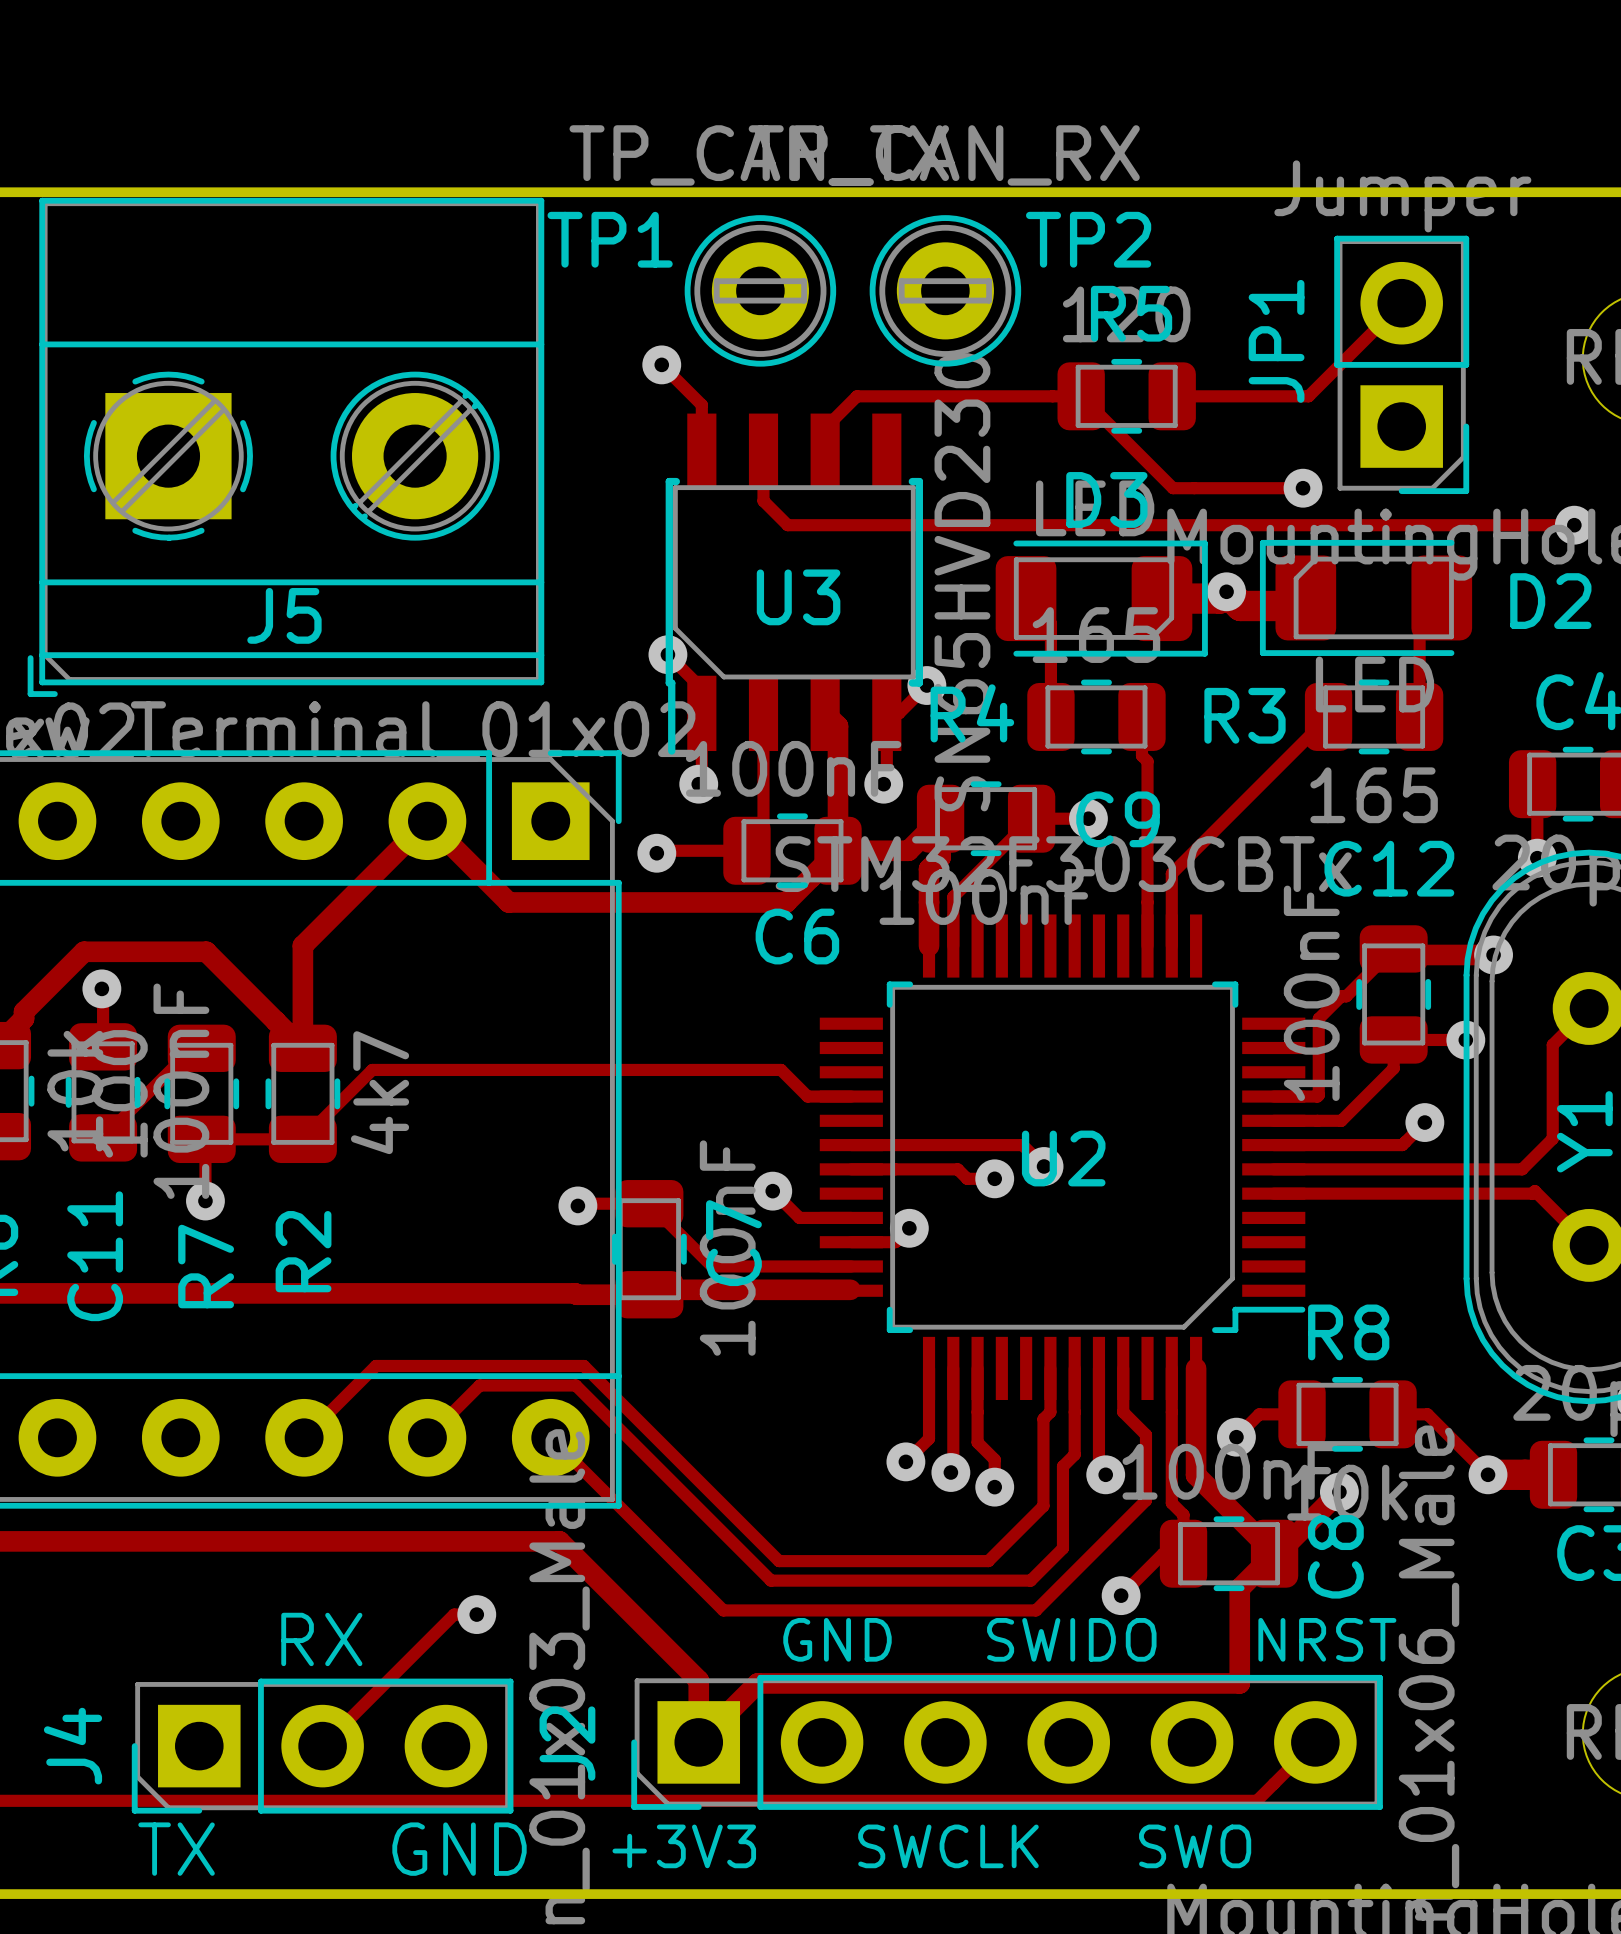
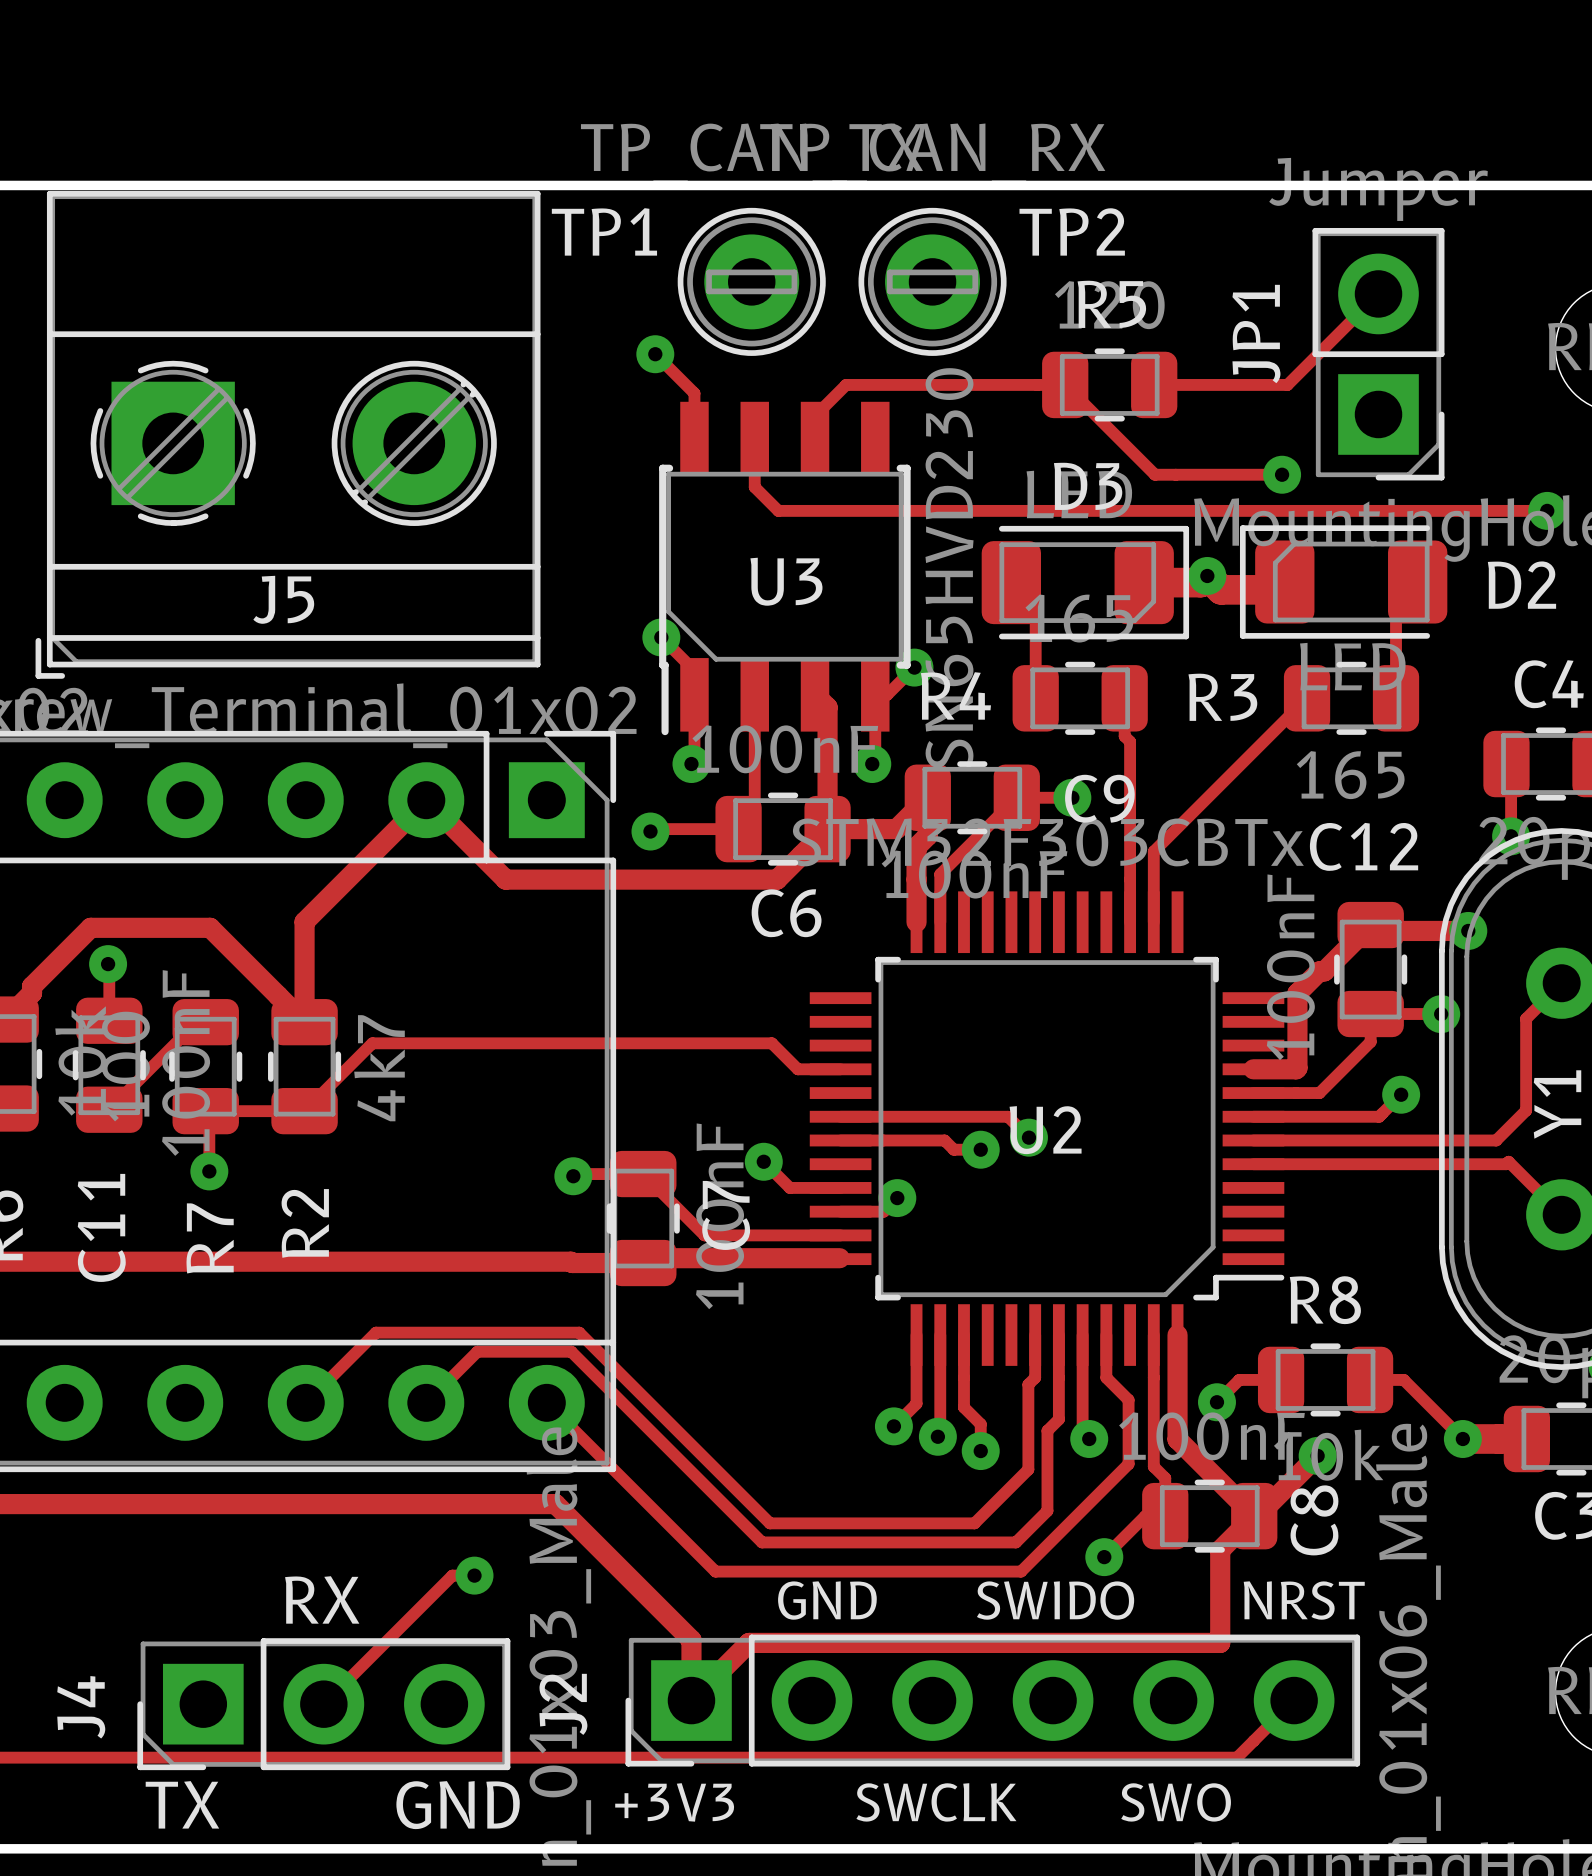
track width: thin (1393, 948) (1346, 996) (1341, 996) (1318, 1018) (1318, 1095) (1273, 1096) -> thick (1370, 925) (1324, 971) (1319, 971) (1297, 993) (1297, 1068) (1253, 1069)

